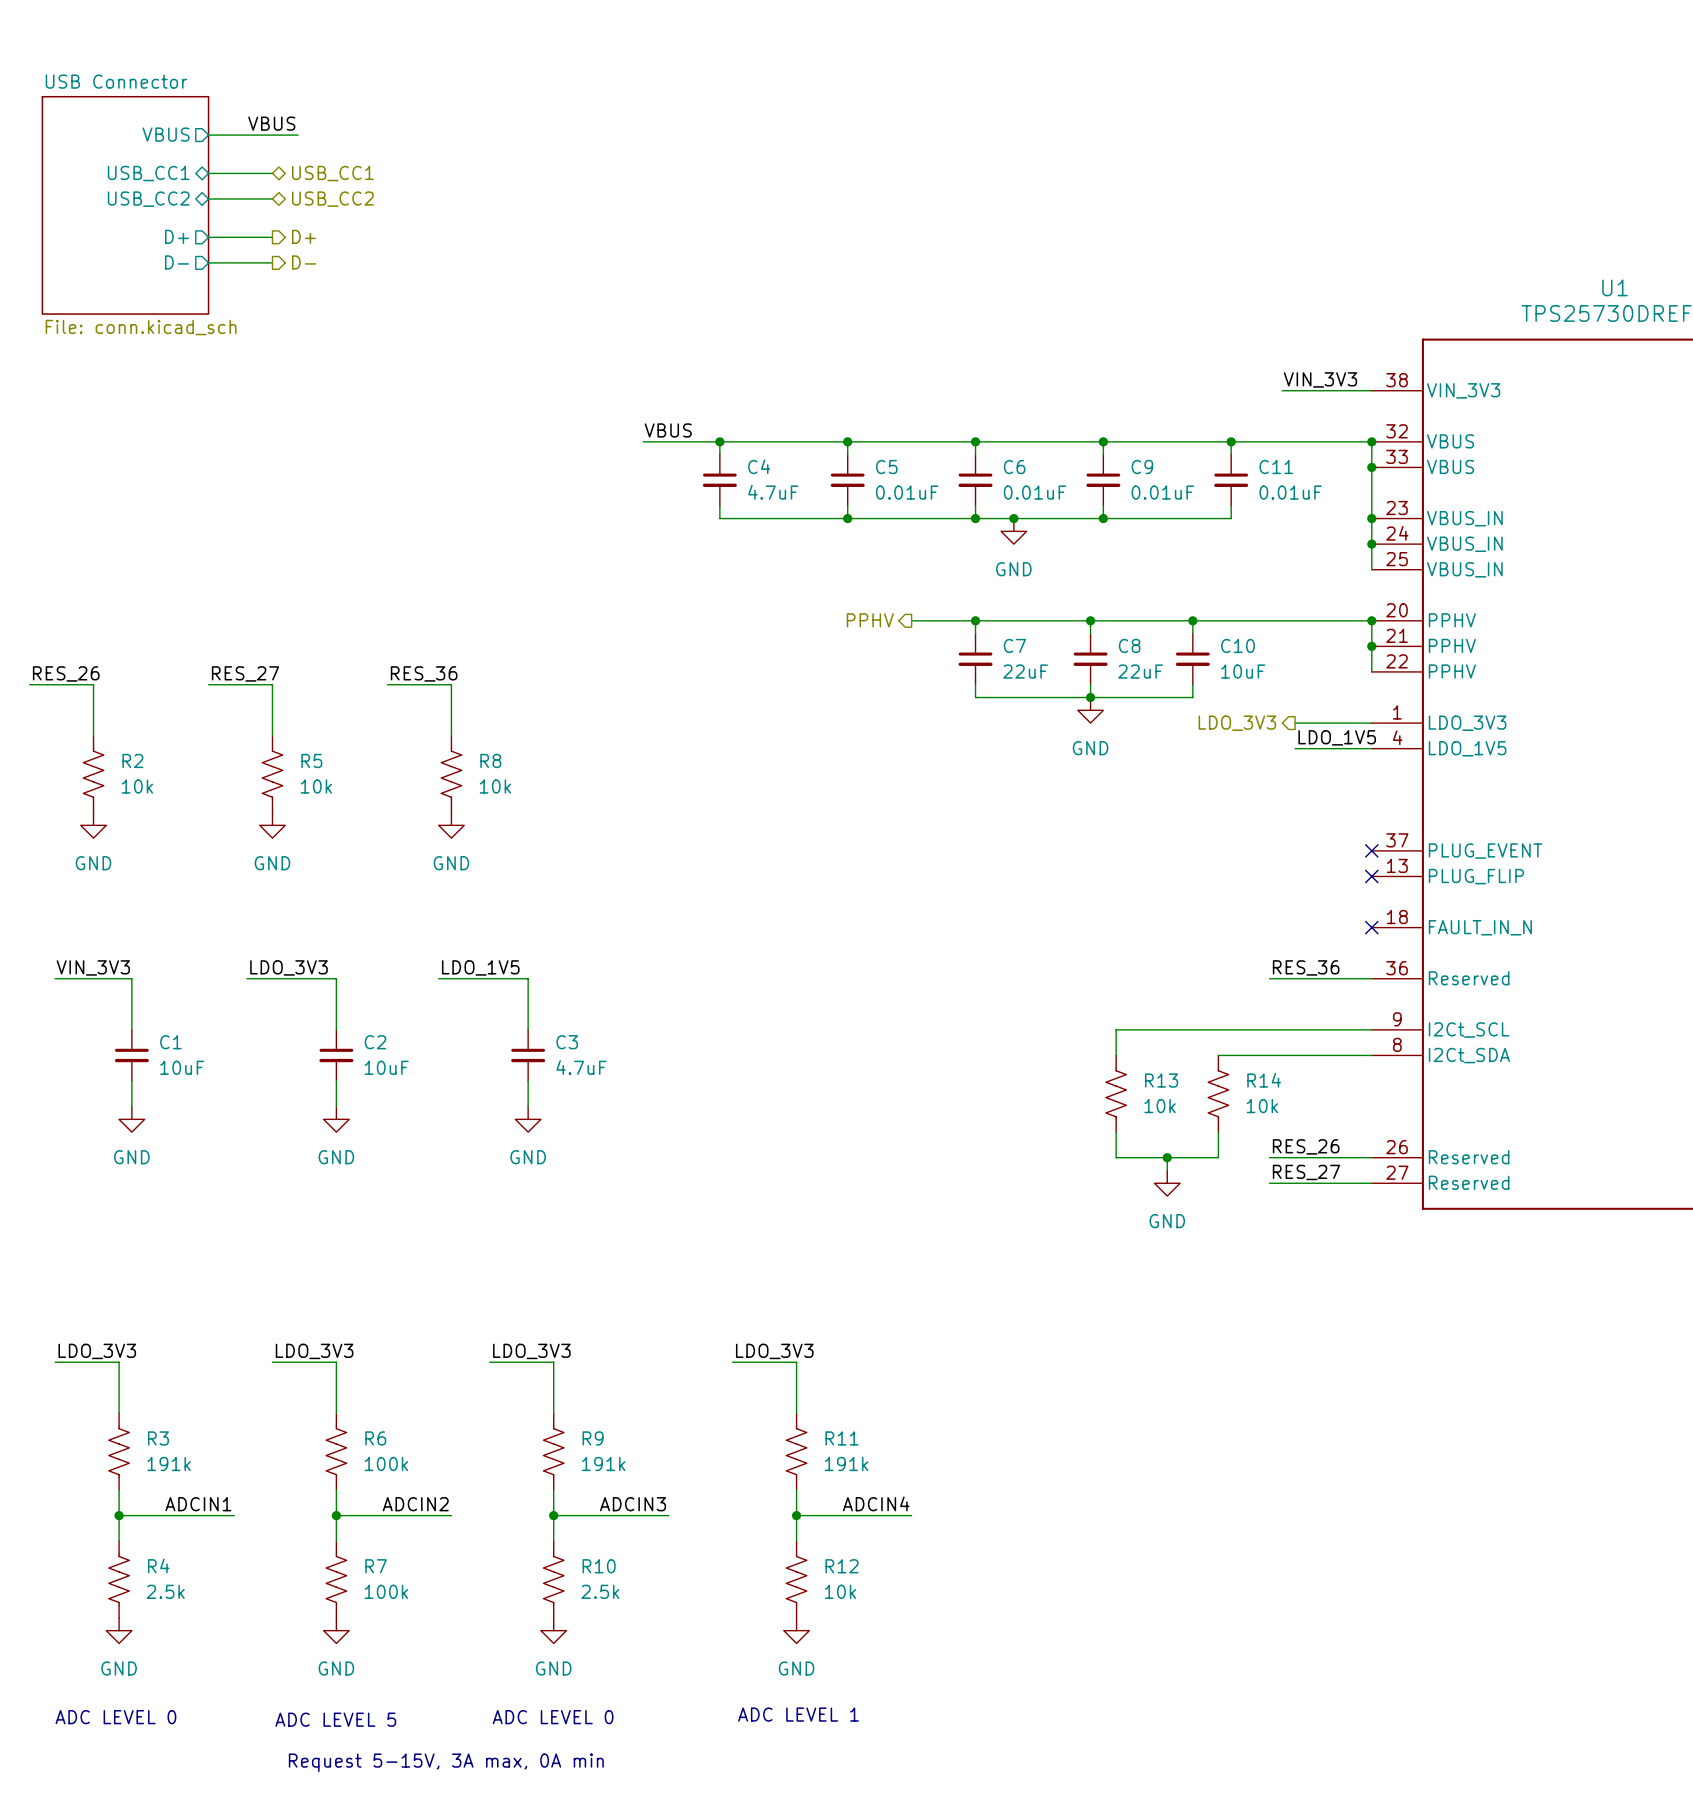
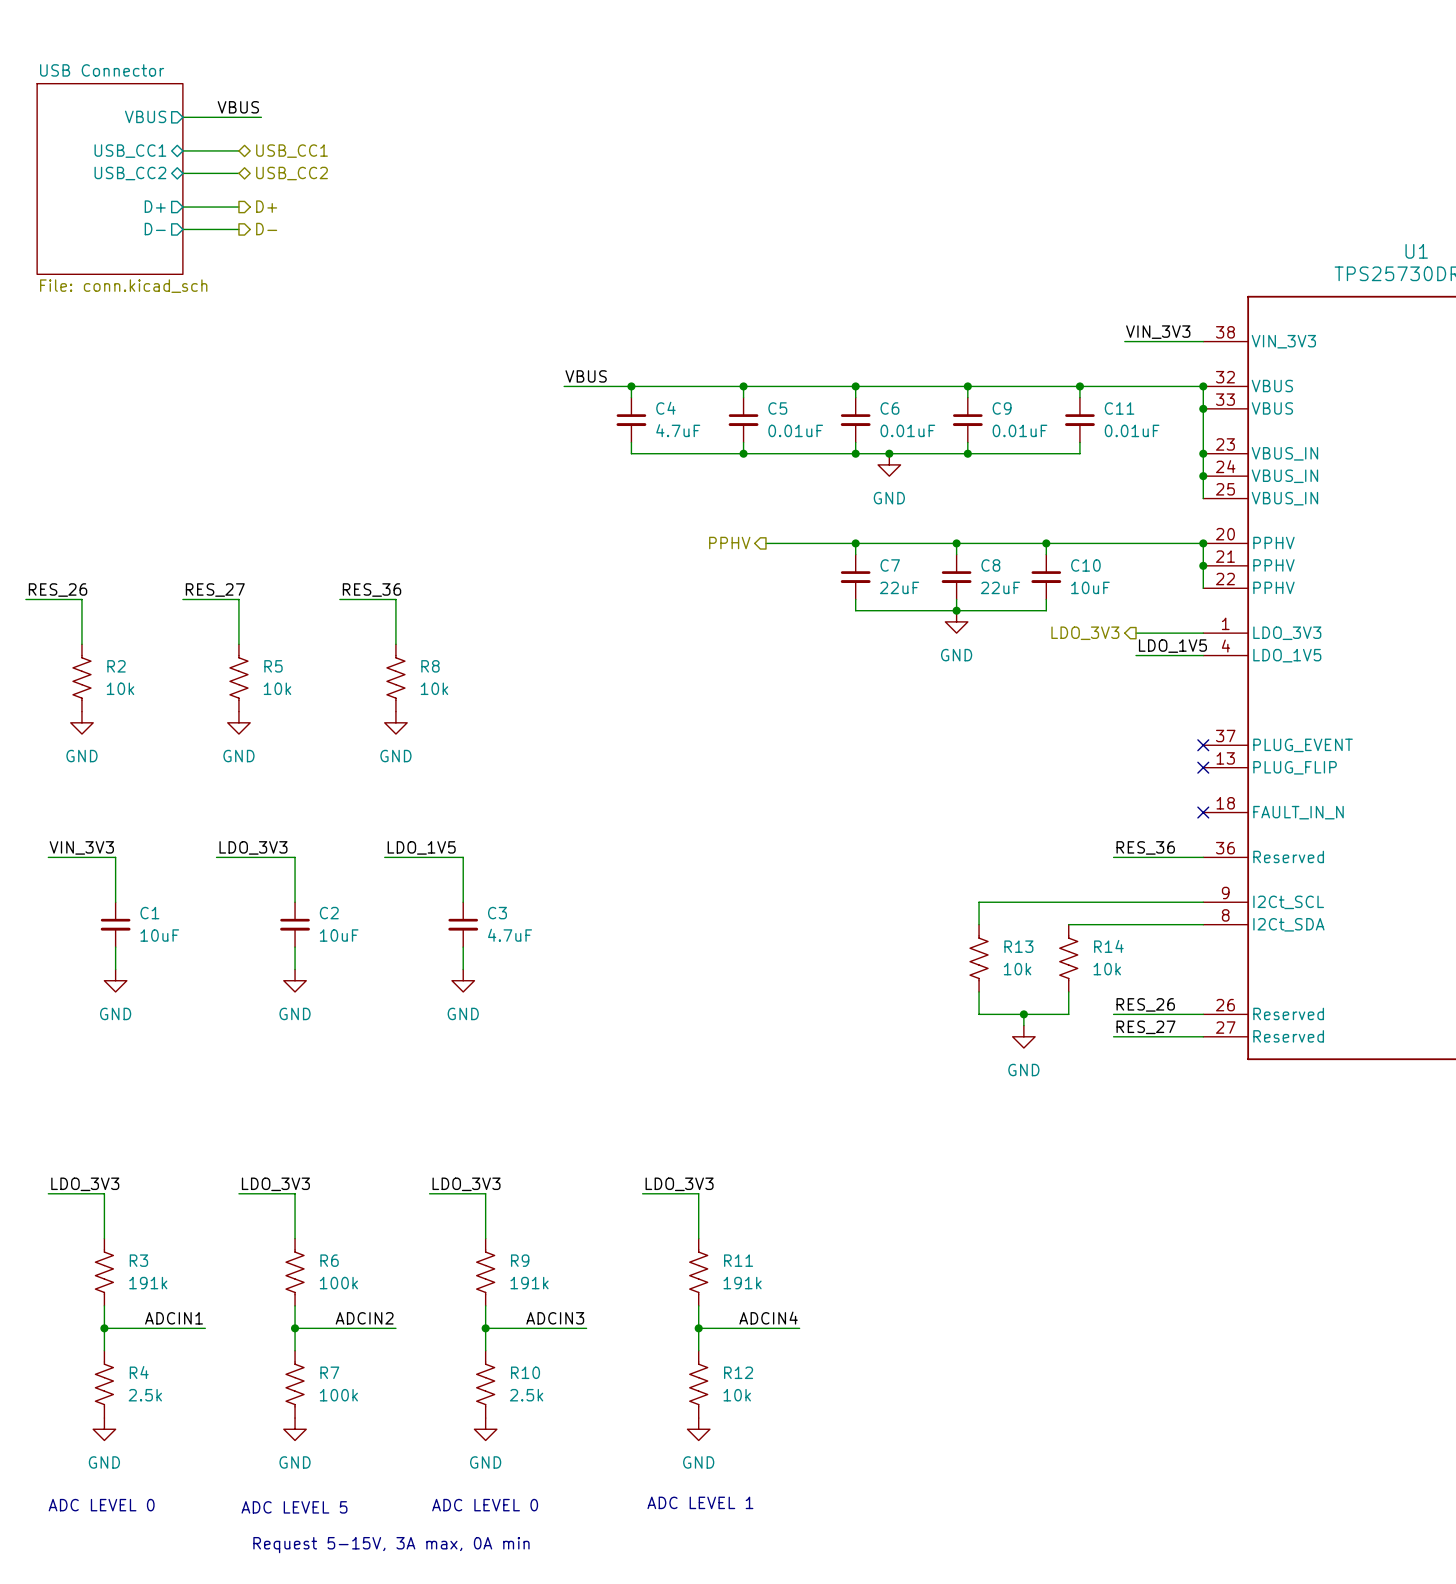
hierarchical label position: PPHV (870, 620) -> PPHV (729, 543)
wire: none -> (765, 543) (799, 543)

